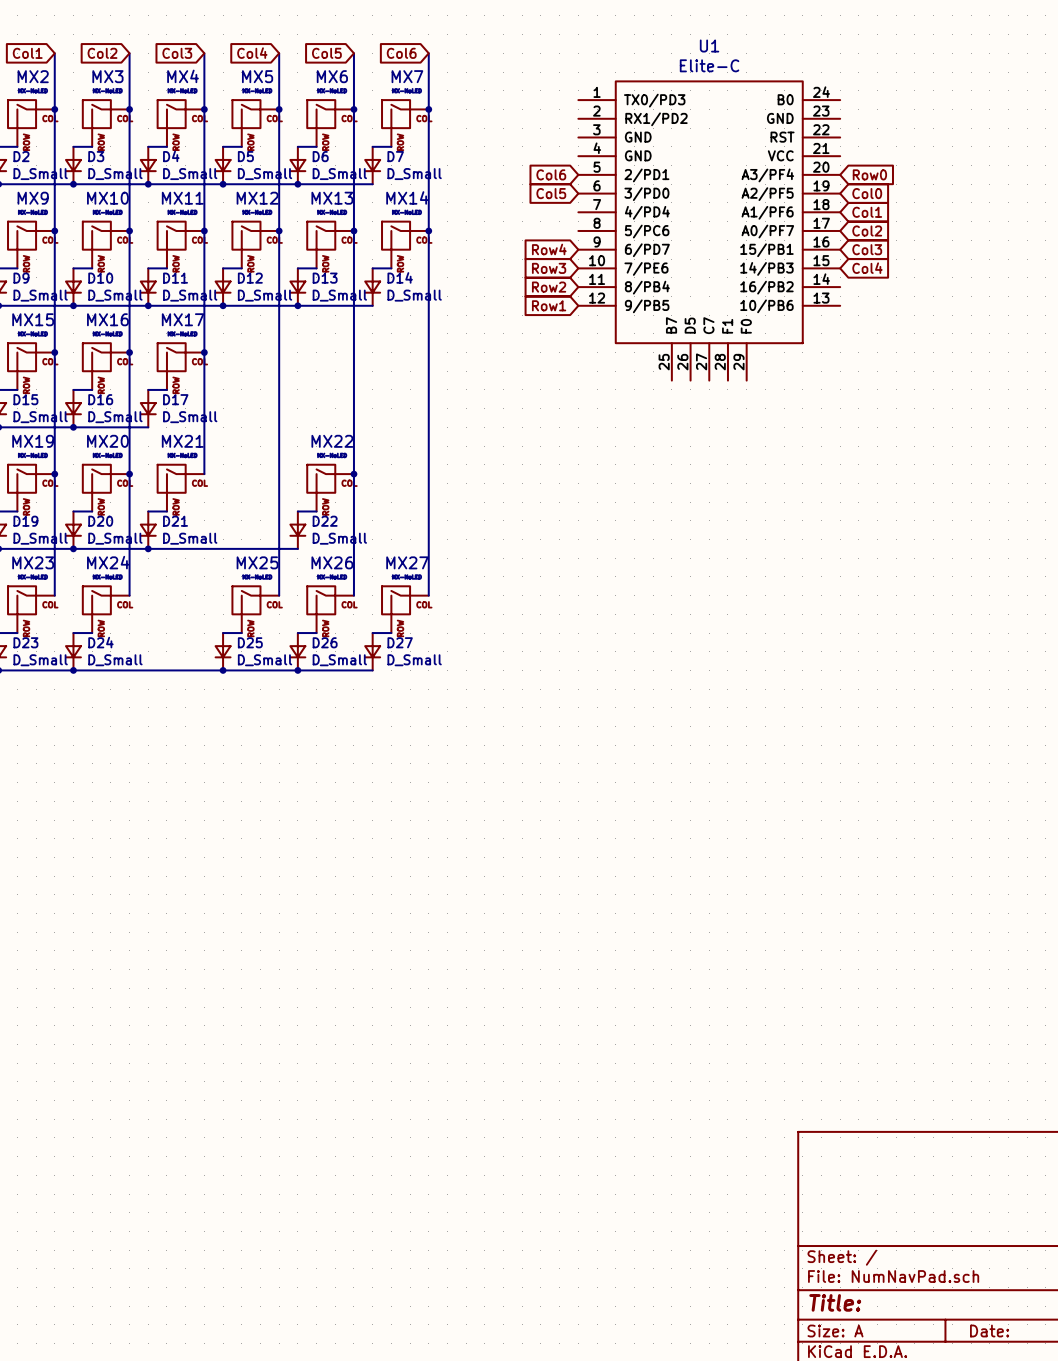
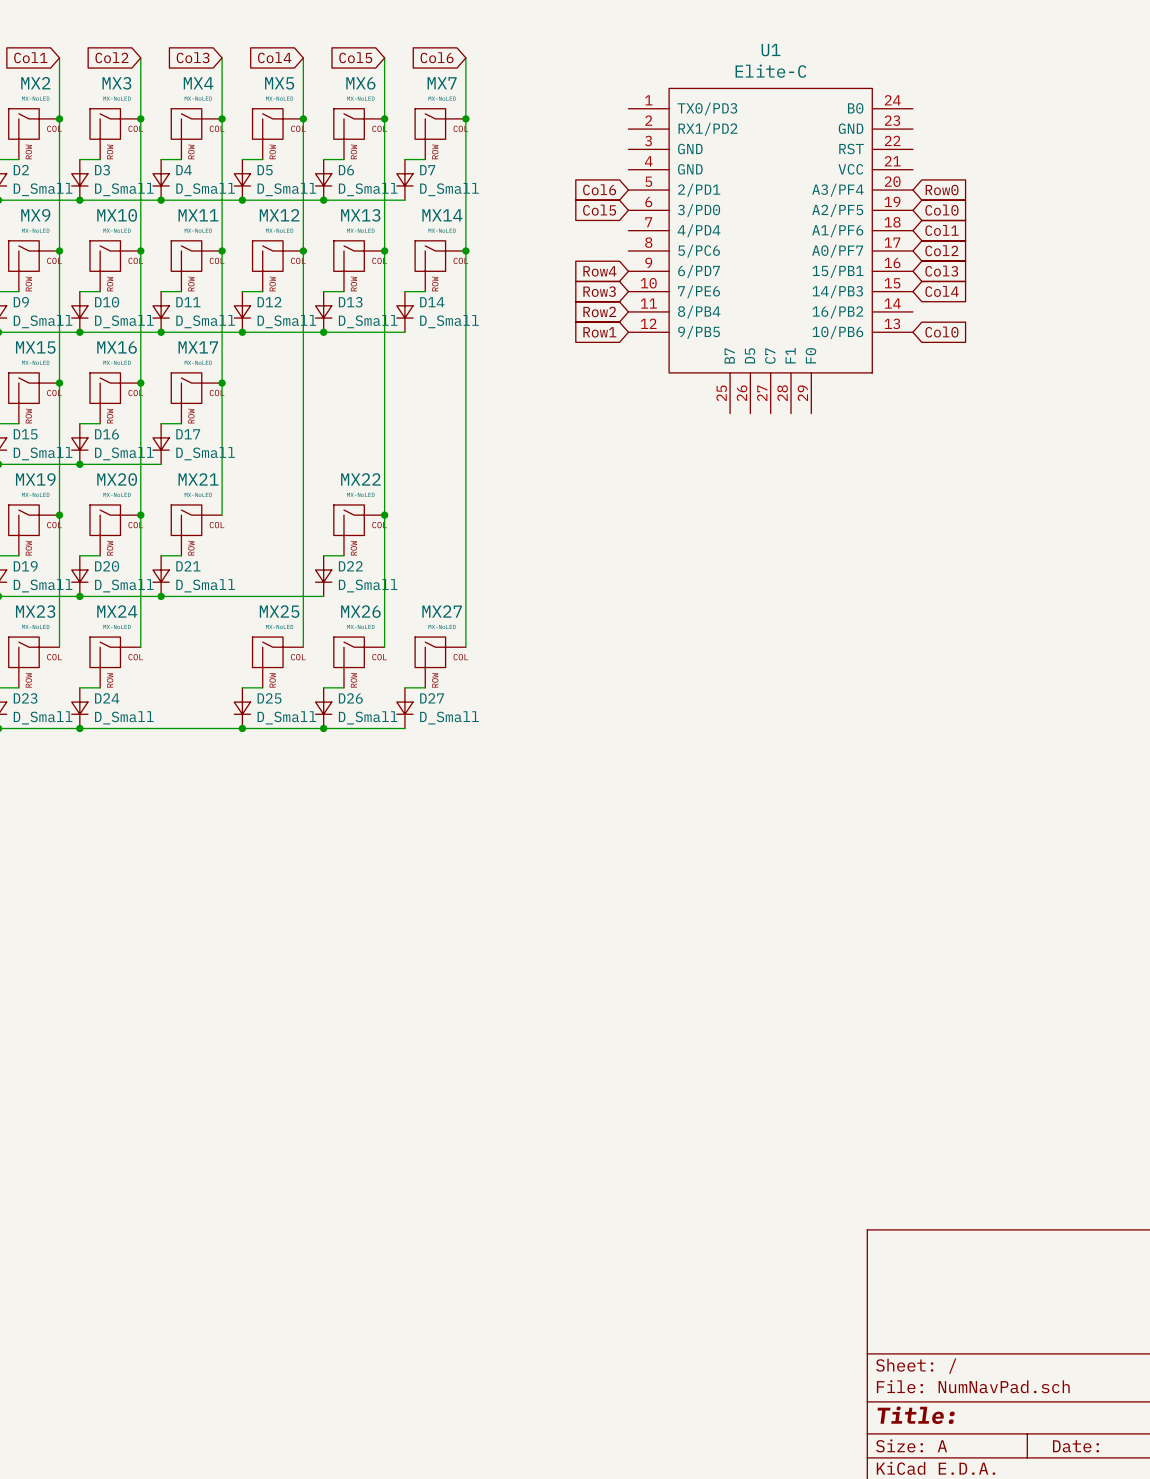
global label: none -> Col0 (941, 332)

